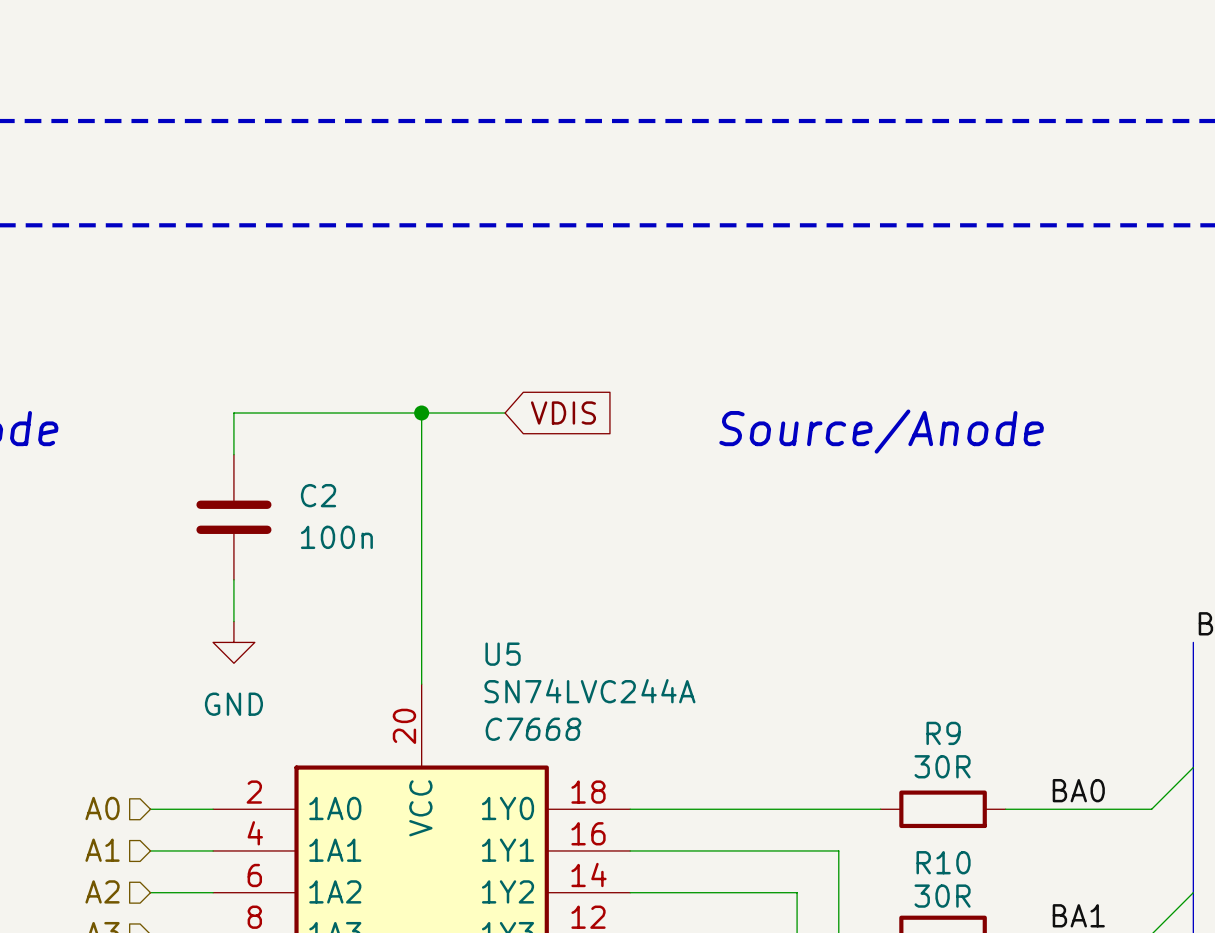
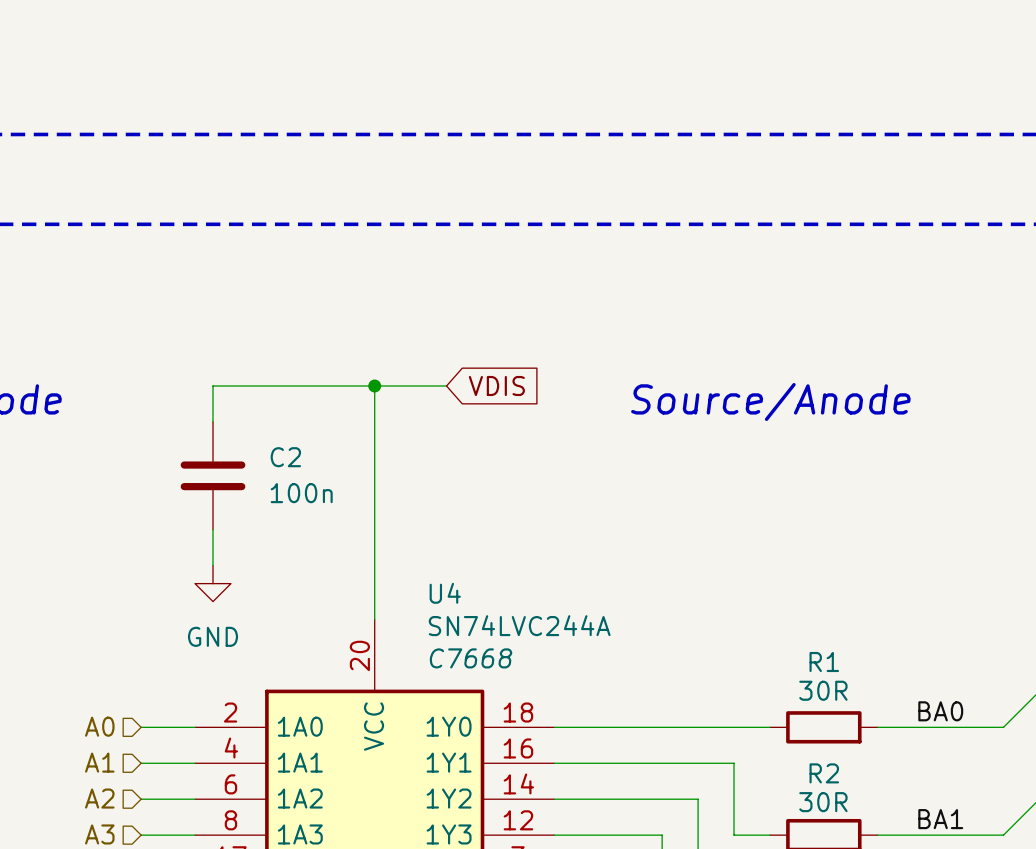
U5 name: U5 (503, 654) -> U4 (445, 593)
R9 name: R9 (943, 733) -> R1 (824, 662)
R10 name: R10 (943, 862) -> R2 (824, 773)

